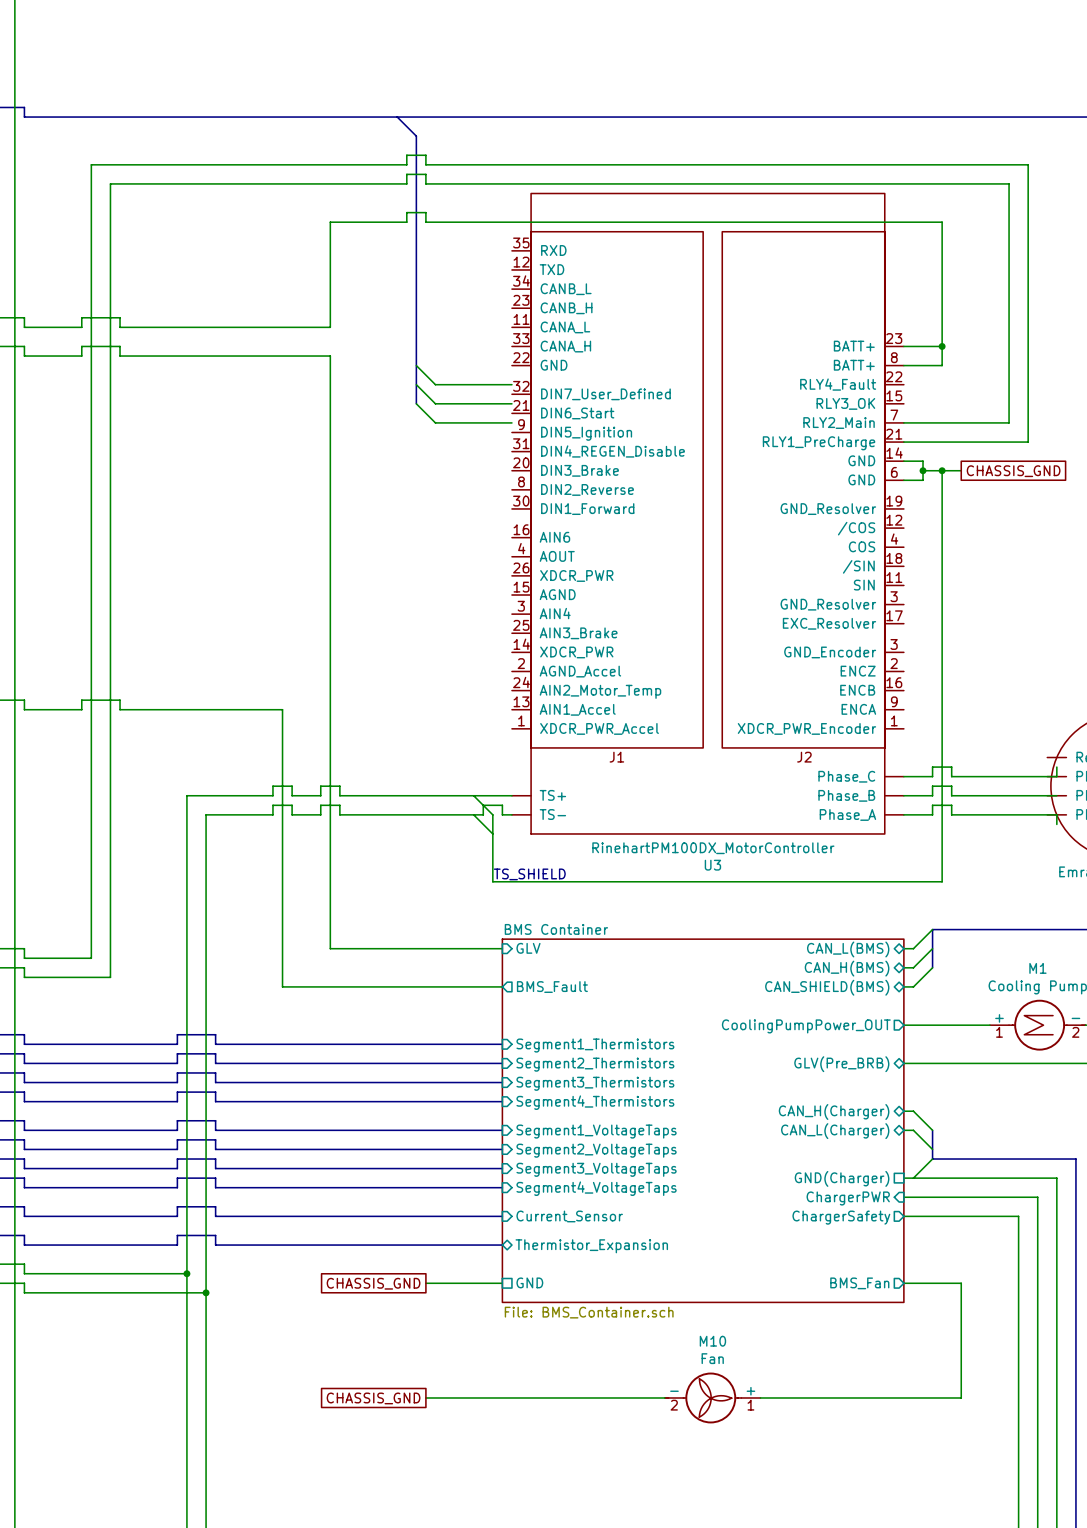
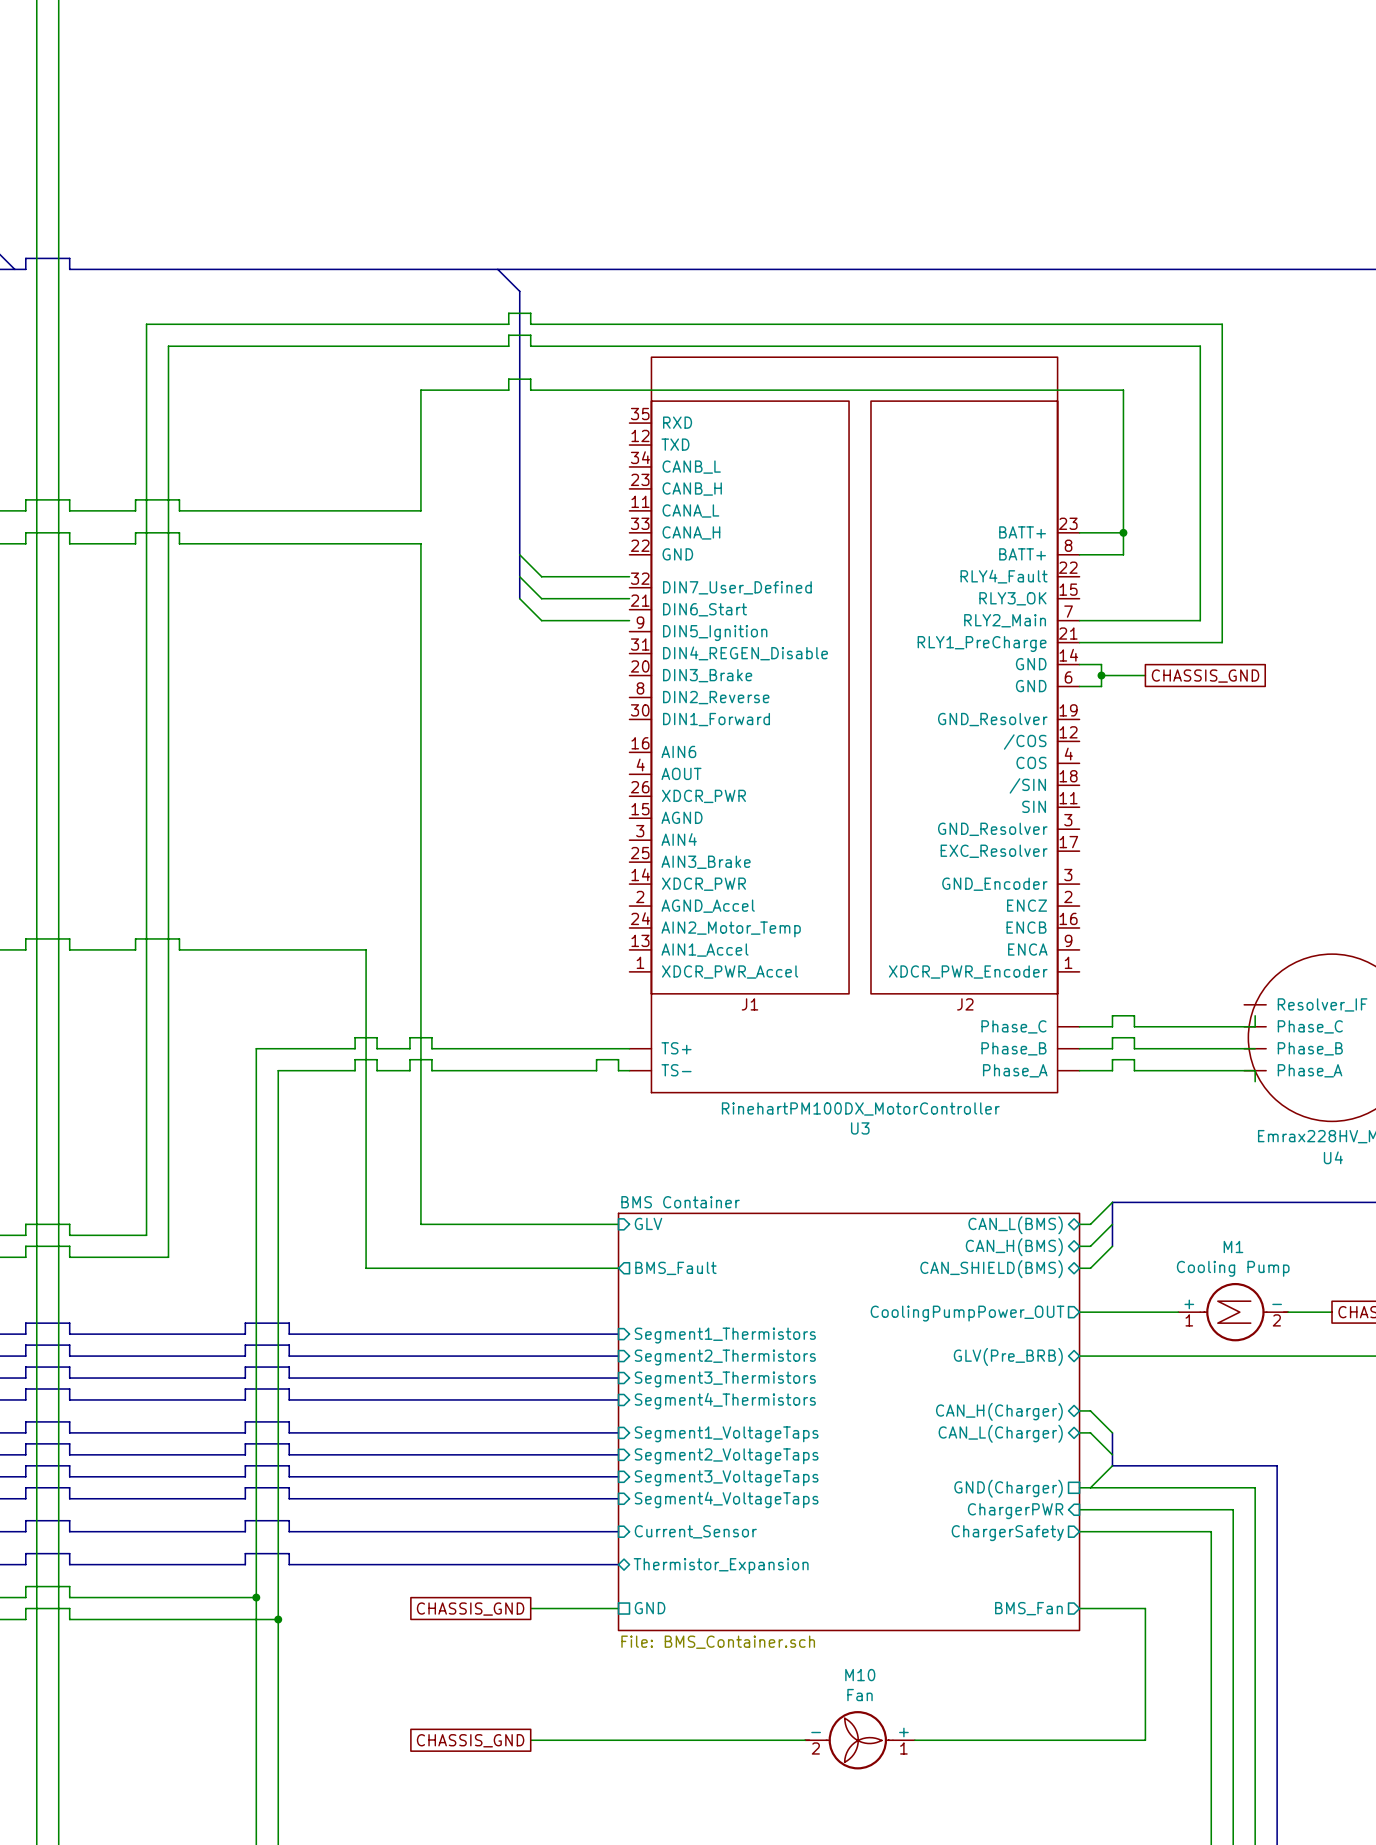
wire: (942, 470) (942, 881) (492, 881) (492, 814) (473, 795) -> none
junction: (942, 470) -> none
wire: (473, 814) (492, 833) -> none
text: TS_SHIELD (529, 874) -> none

